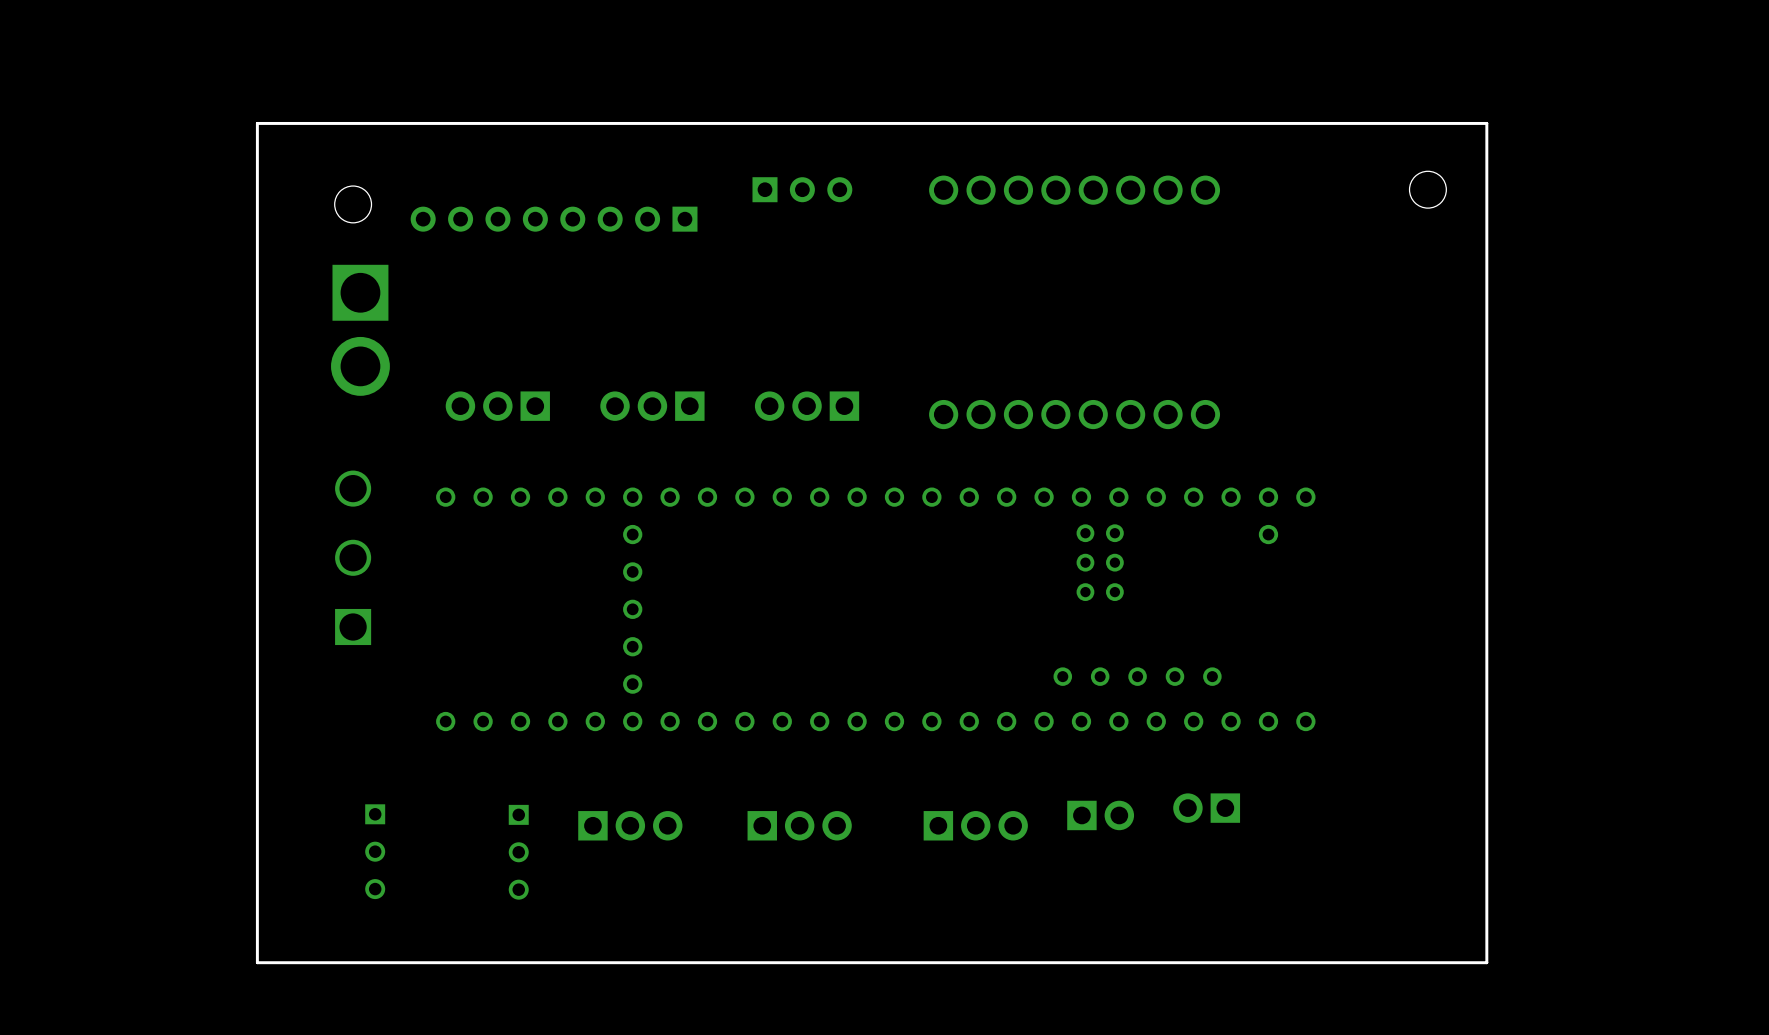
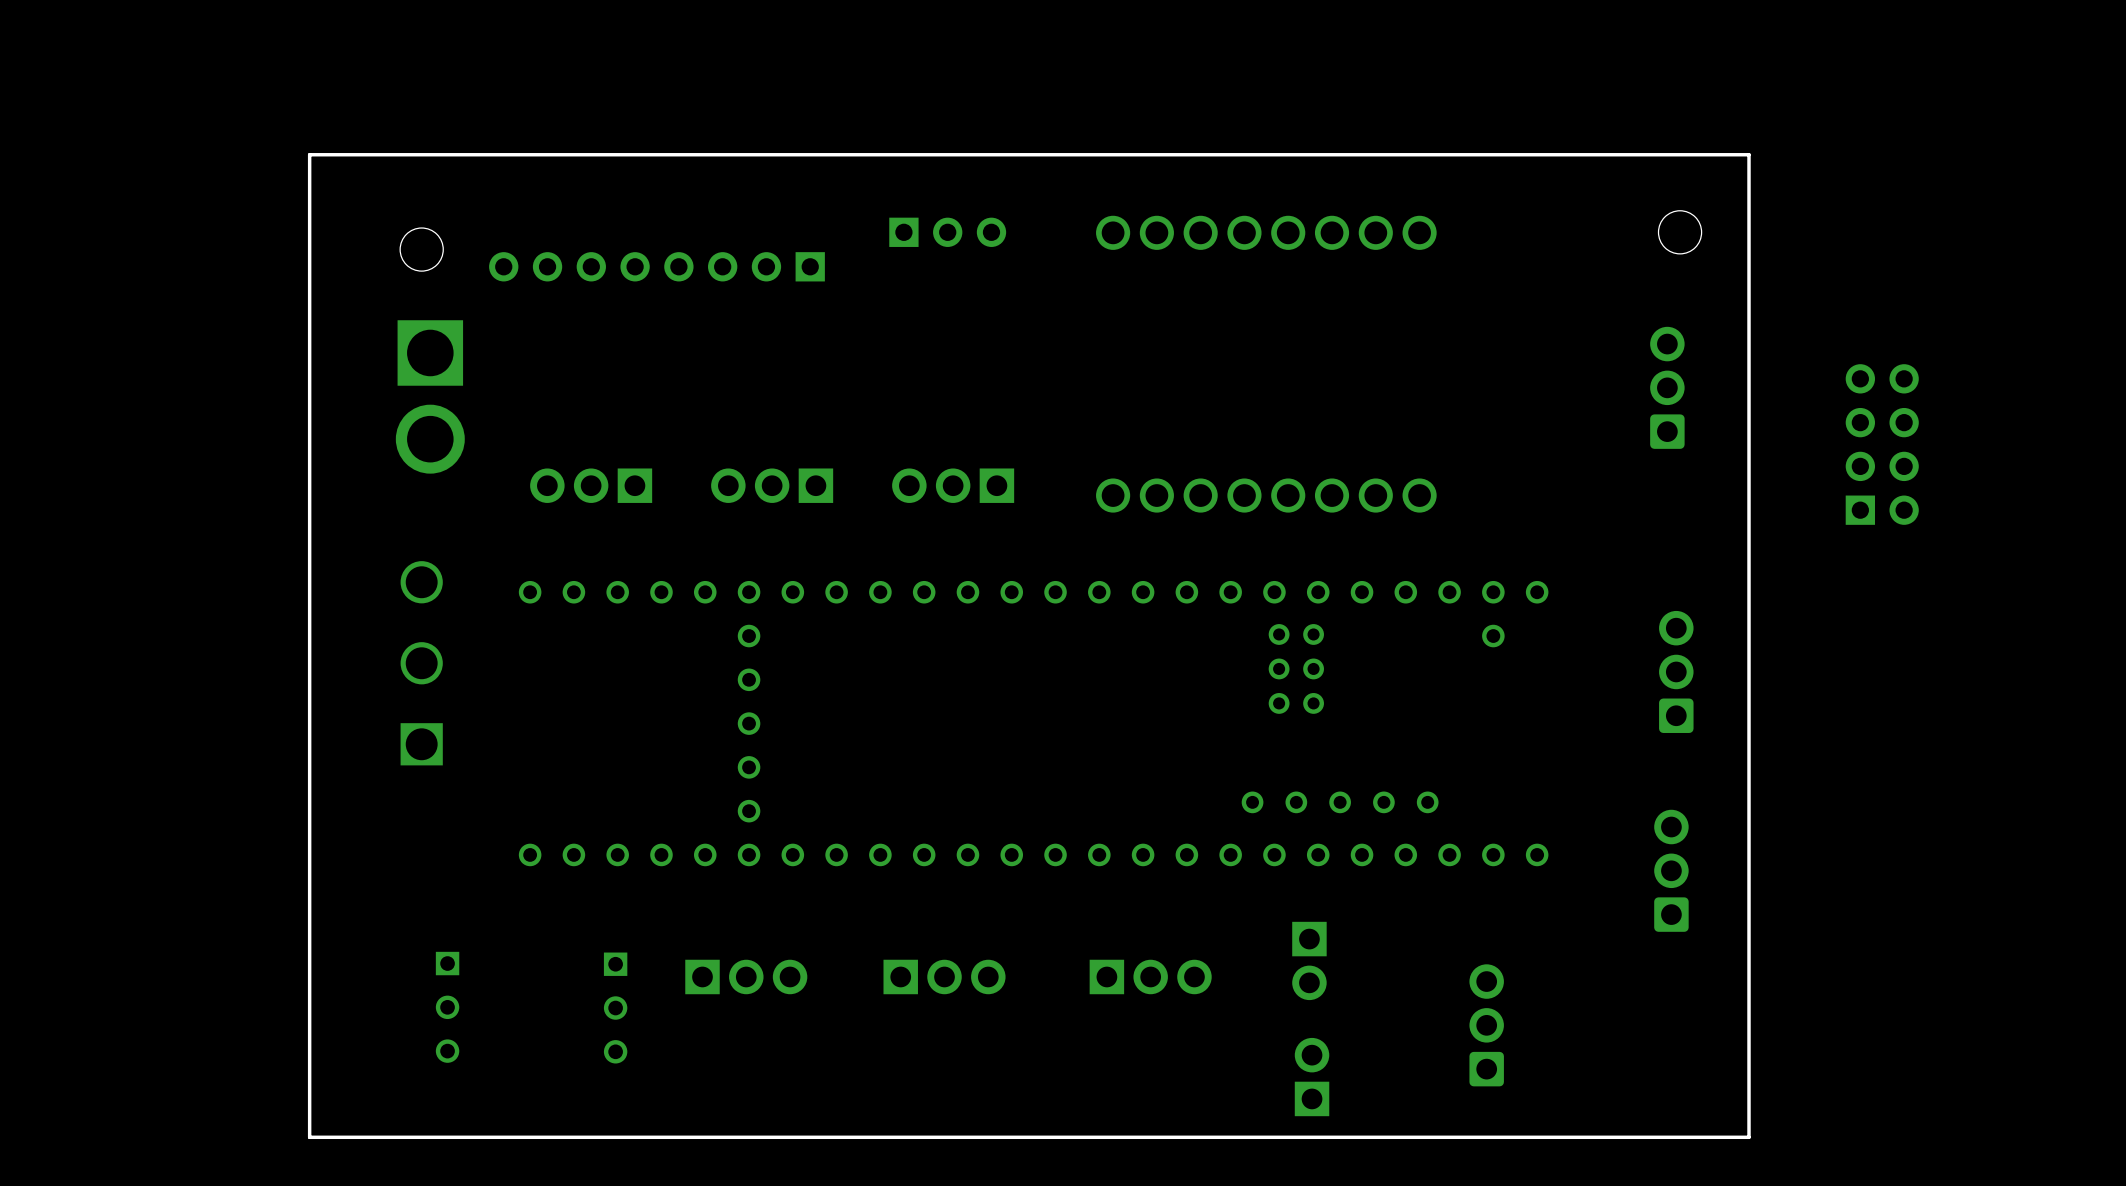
part: none -> (1667, 387)
part: none -> (1882, 444)
part: none -> (1676, 671)
part: none -> (1671, 870)
part rotation: 0° (1206, 808) -> 90° clockwise (1312, 1077)
part position: (1206, 808) -> (1312, 1077)
part rotation: 0° (1100, 815) -> 90° clockwise (1309, 960)
part: none -> (1486, 1025)

